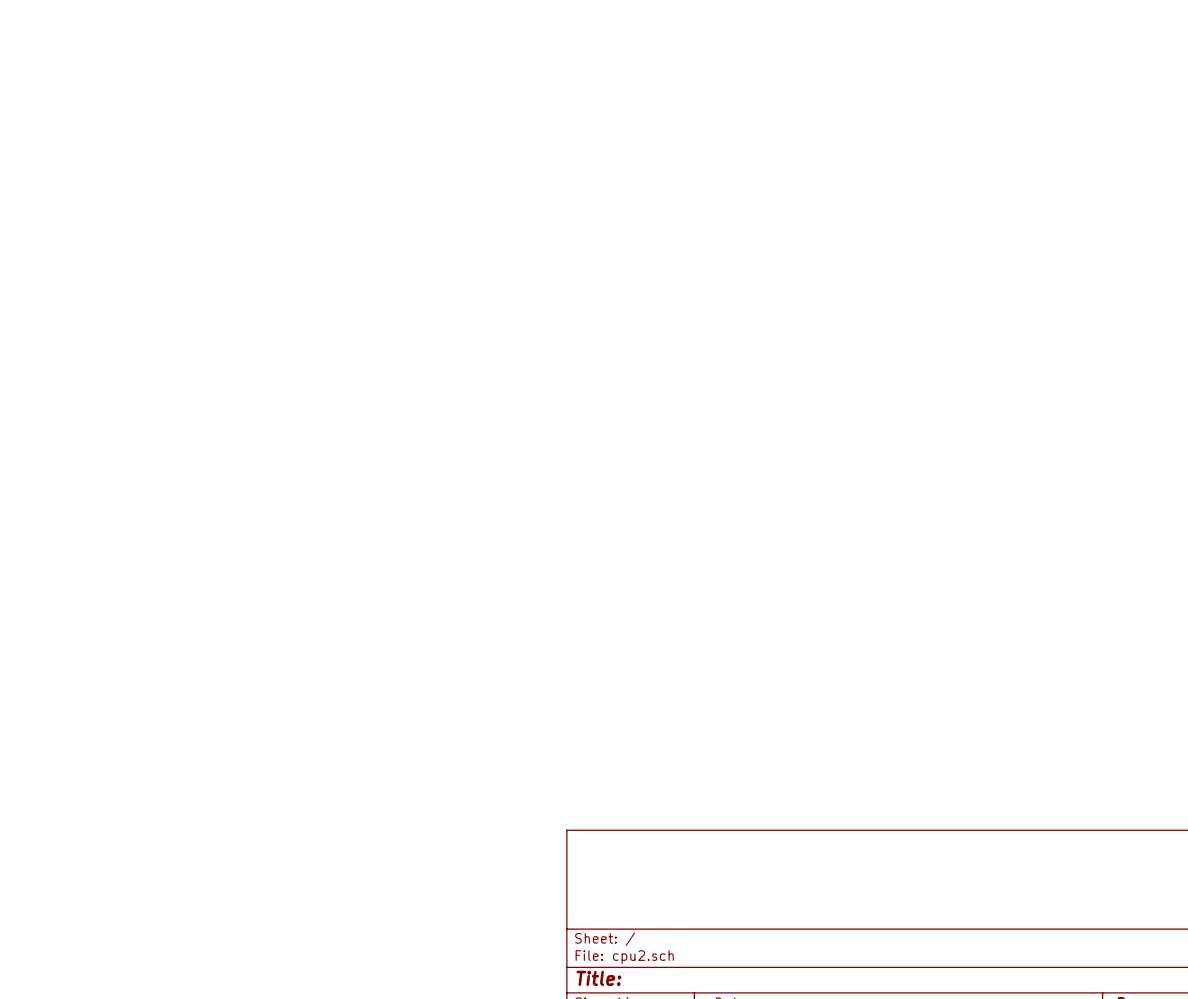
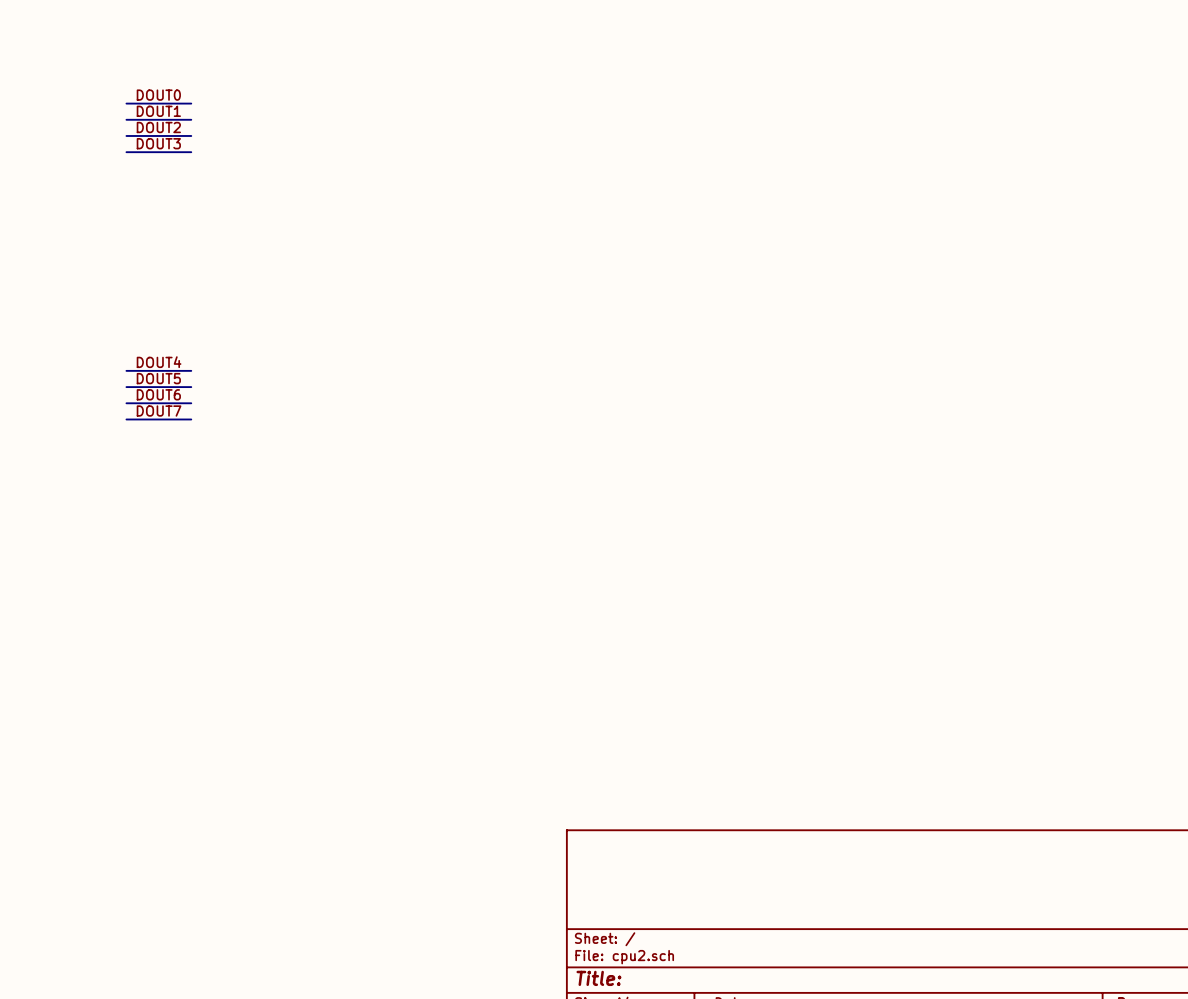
label: none -> DOUT0 (158, 95)
wire: none -> (126, 103) (191, 103)
label: none -> DOUT1 (158, 111)
wire: none -> (126, 119) (191, 119)
label: none -> DOUT2 (158, 127)
wire: none -> (126, 135) (191, 135)
label: none -> DOUT3 (158, 143)
wire: none -> (126, 152) (191, 152)
label: none -> DOUT4 (159, 362)
wire: none -> (126, 370) (191, 370)
label: none -> DOUT5 (158, 378)
wire: none -> (126, 387) (191, 387)
label: none -> DOUT6 (158, 394)
wire: none -> (126, 403) (191, 403)
label: none -> DOUT7 (159, 411)
wire: none -> (126, 419) (191, 419)

